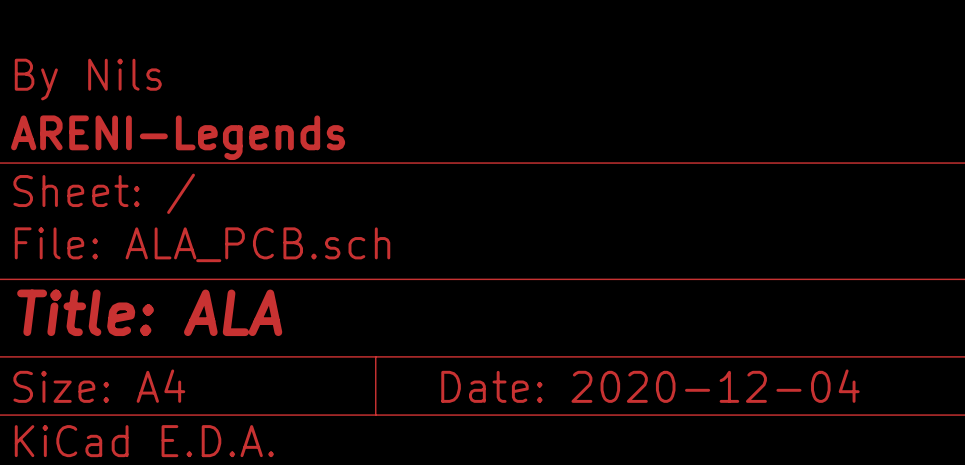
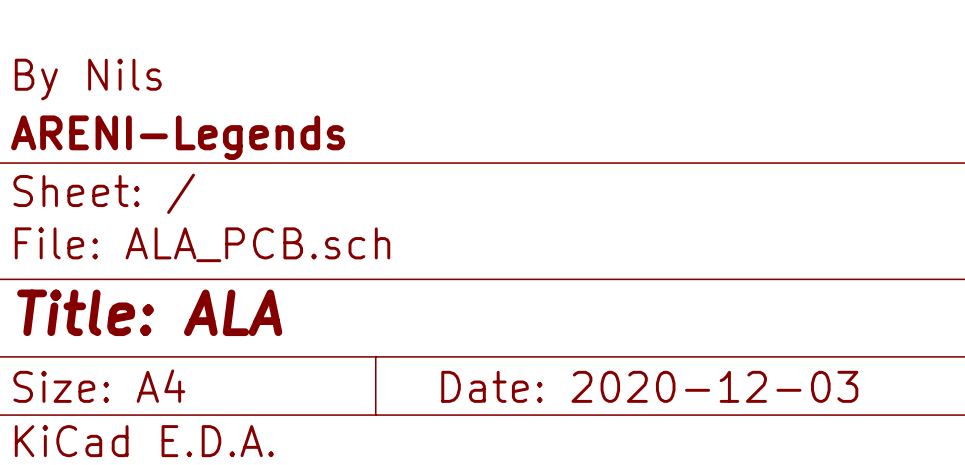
title block: Date: 2020-12-04 (650, 386) -> Date: 2020-12-03 (649, 386)

